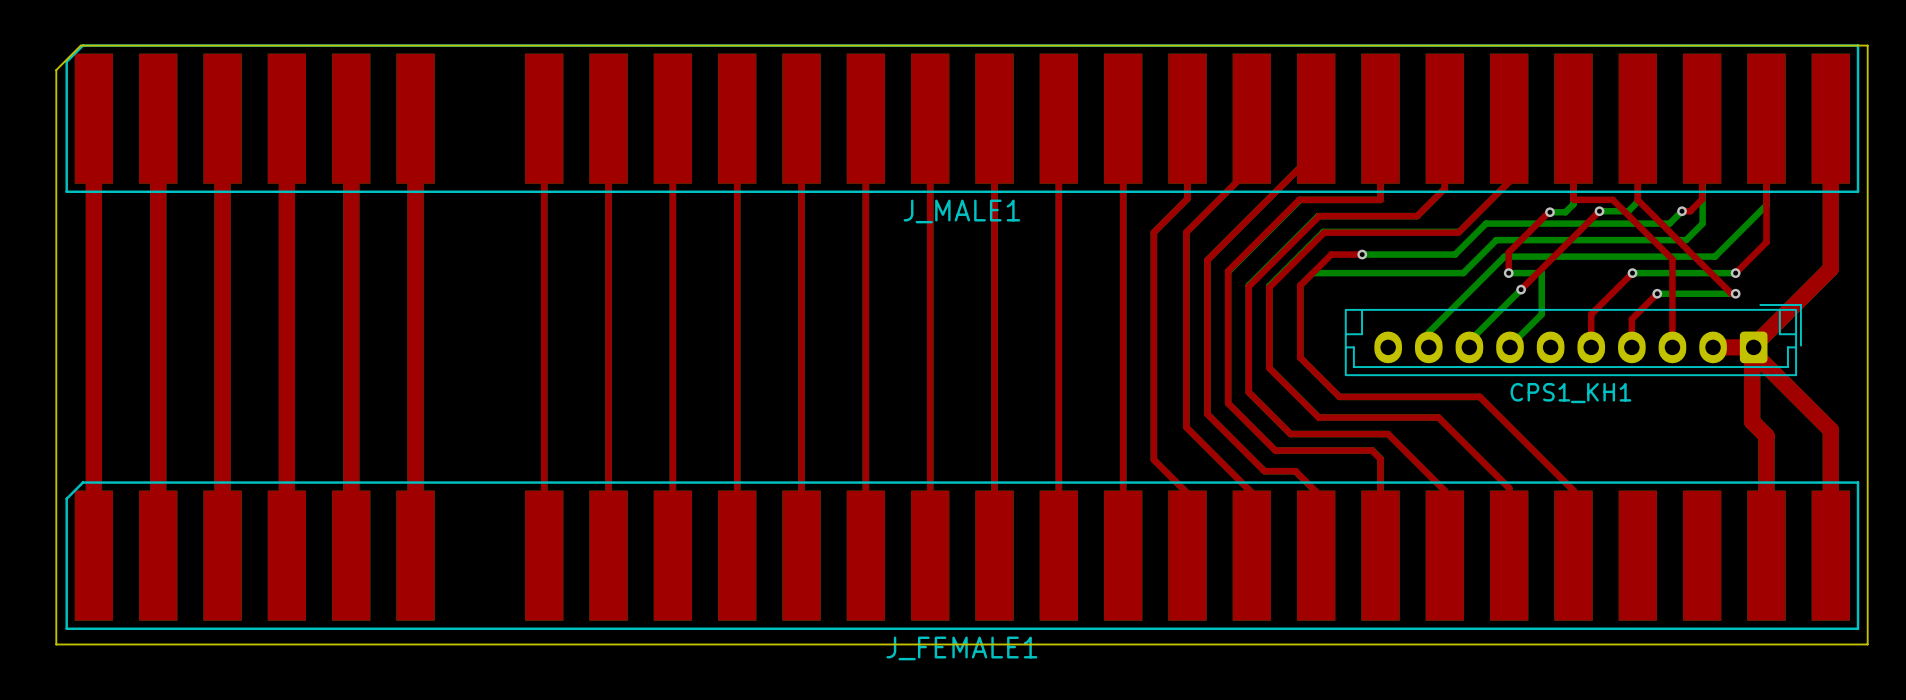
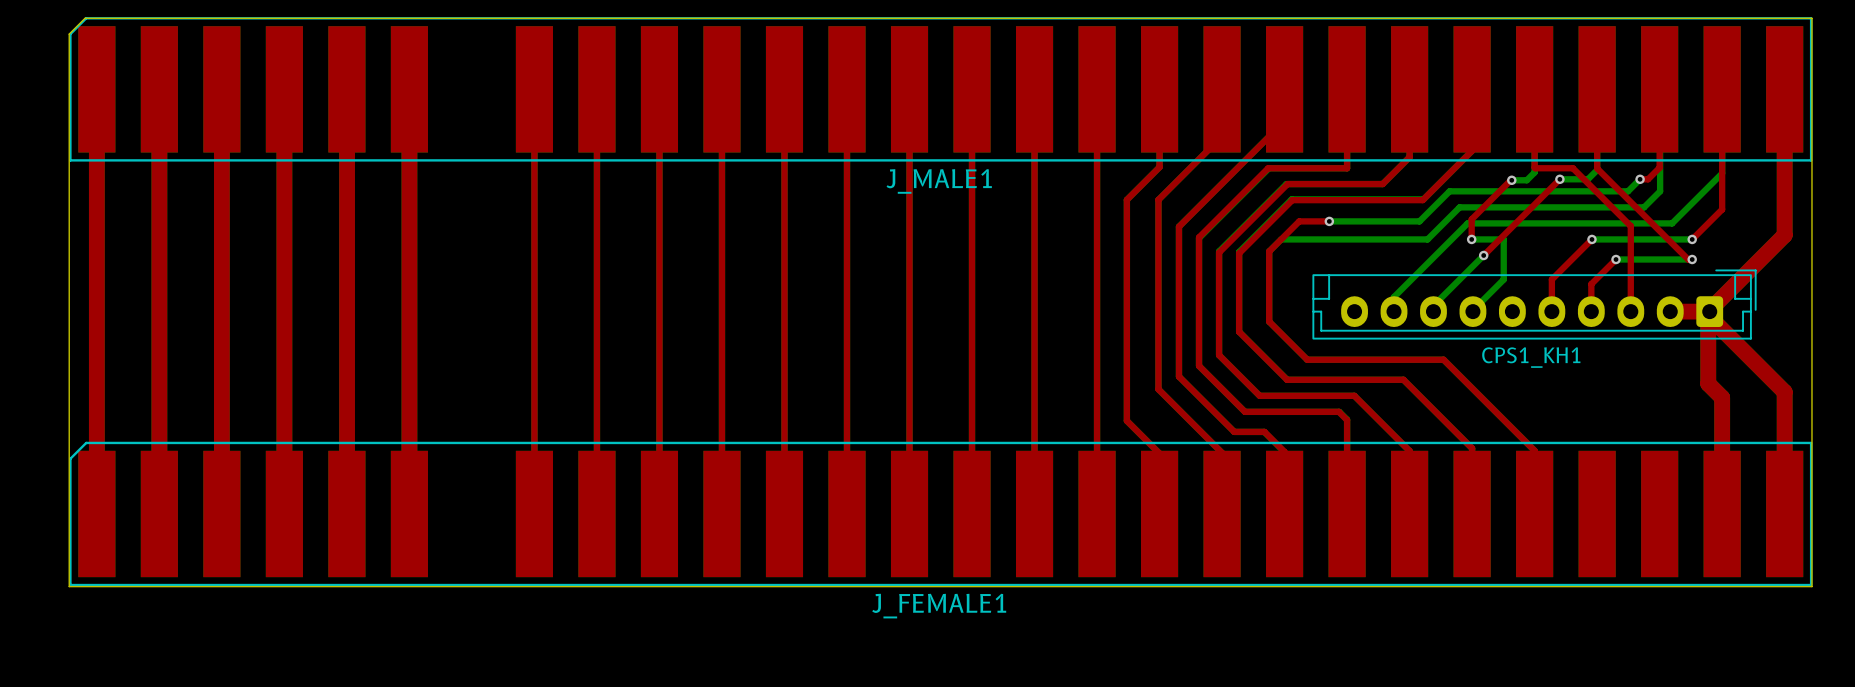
board edge: (81, 45) (56, 70) (56, 644) (1867, 644) (1867, 45) (1858, 45) -> (85, 18) (69, 34) (69, 586) (1811, 586) (1811, 18)

